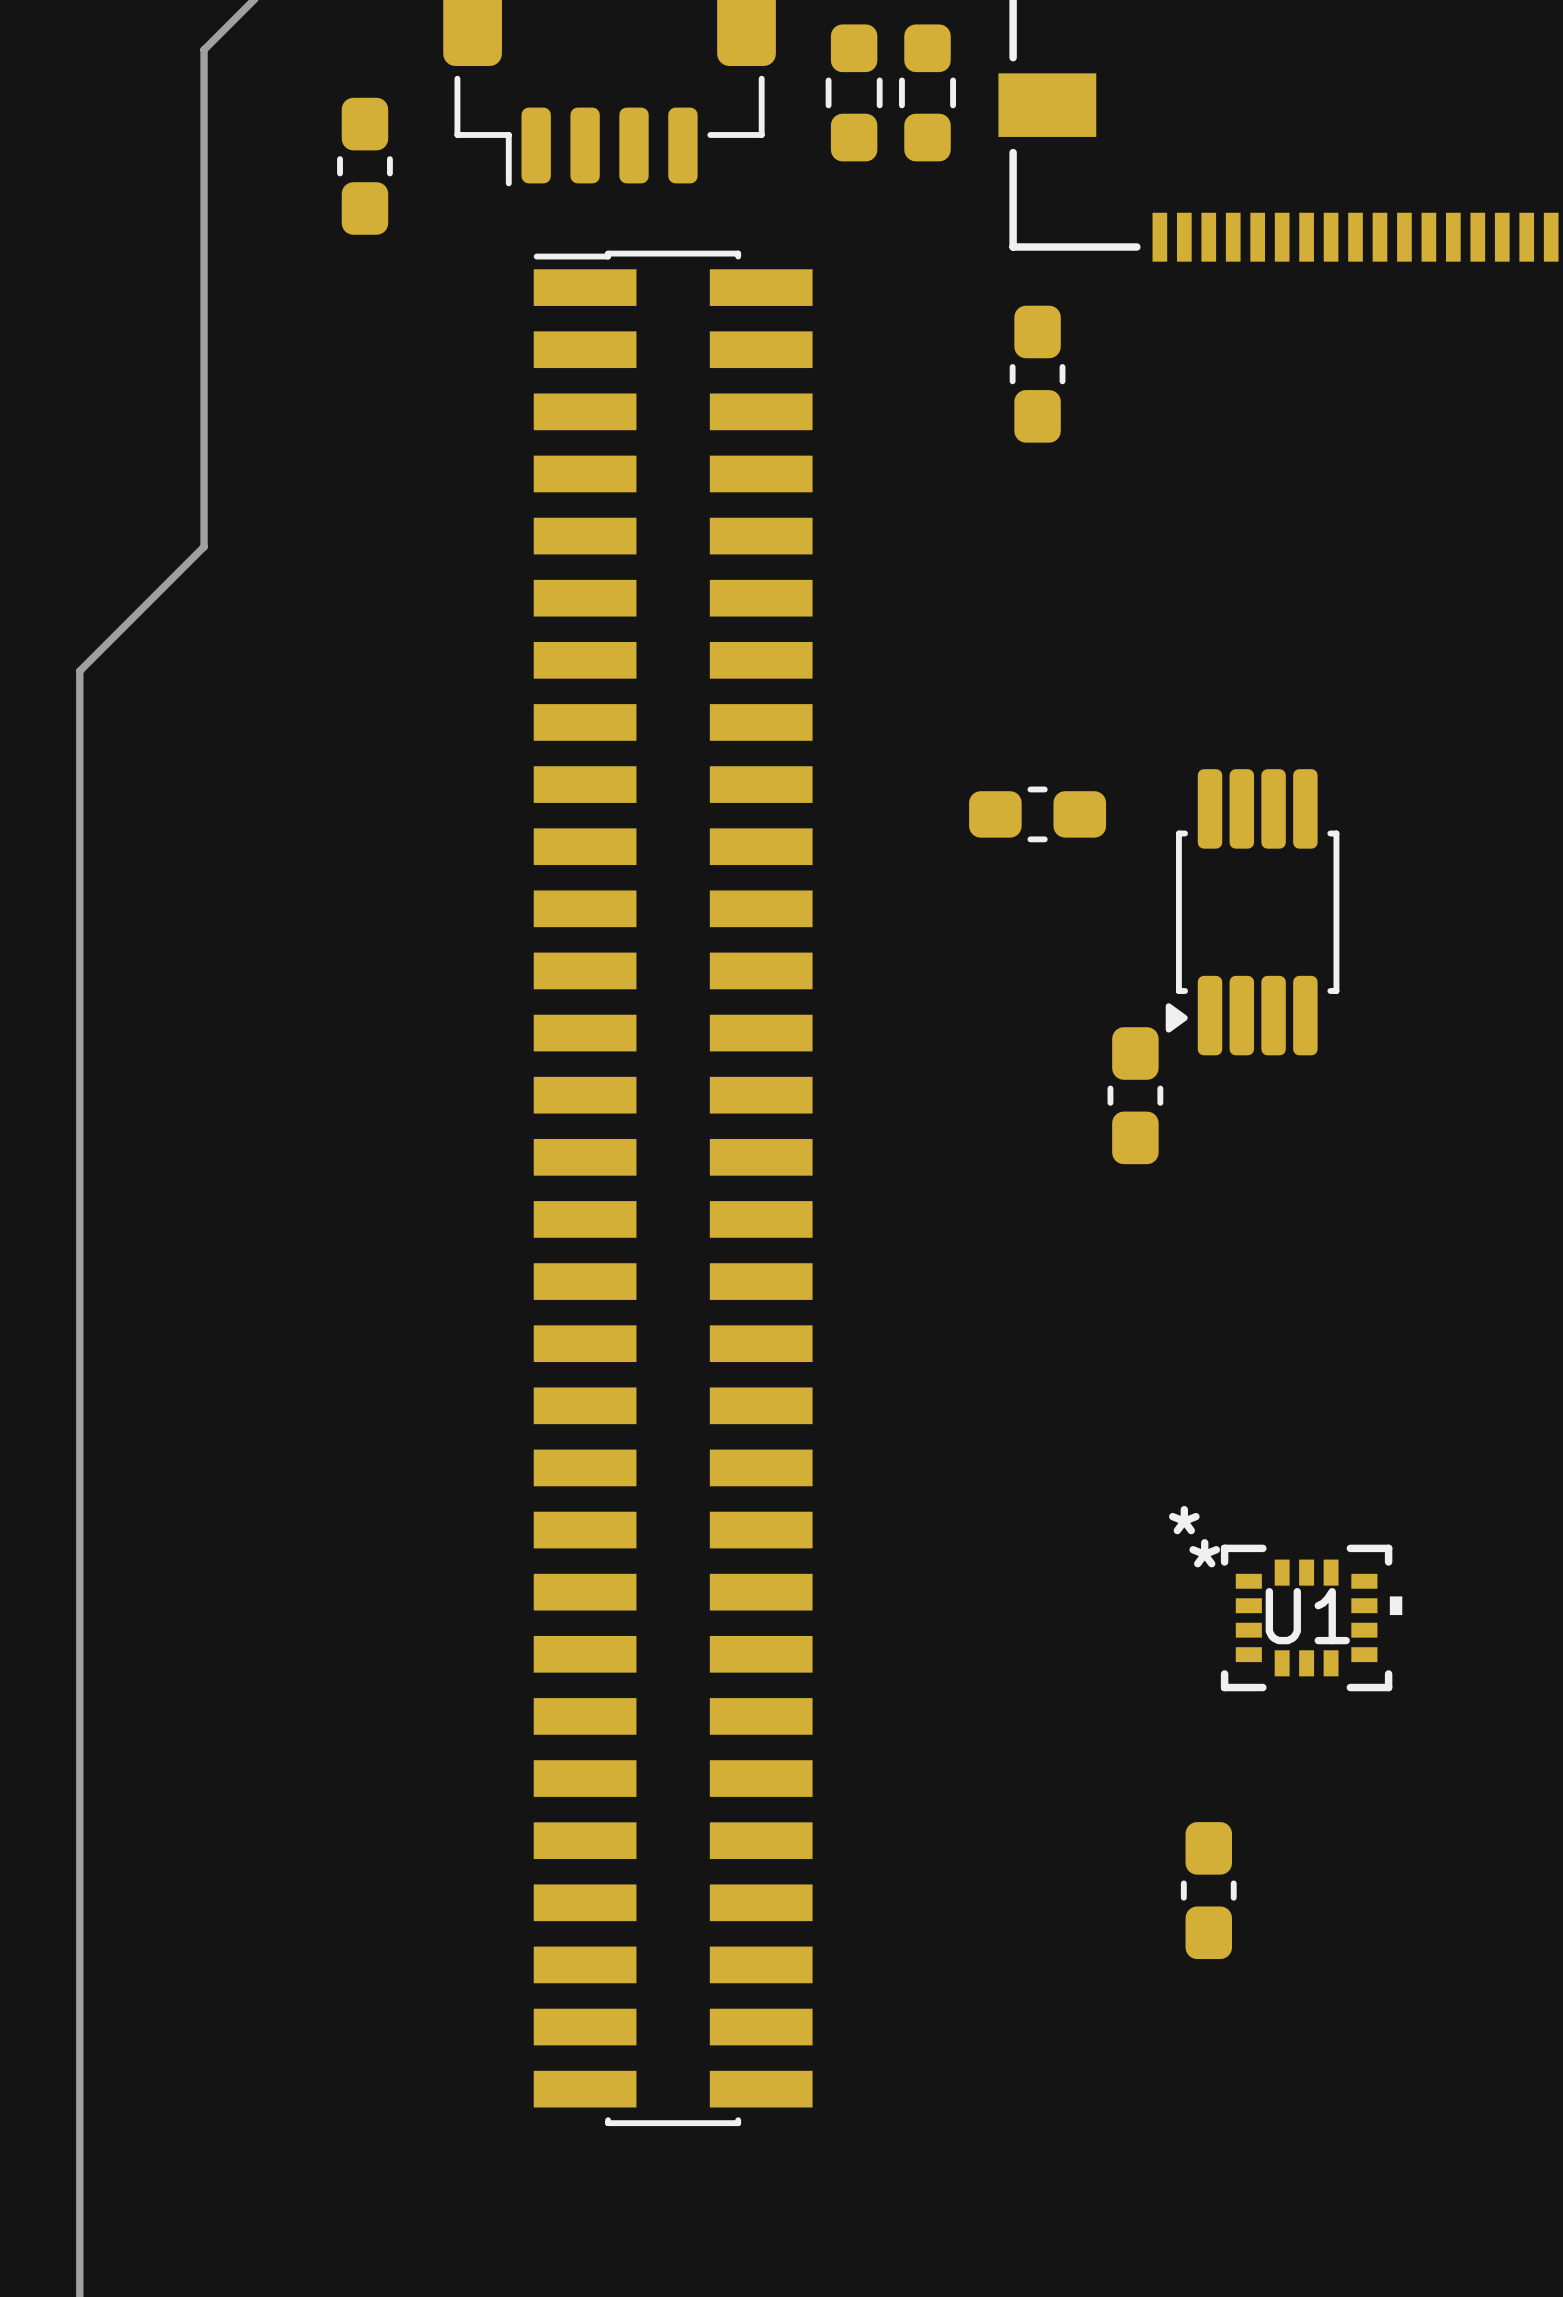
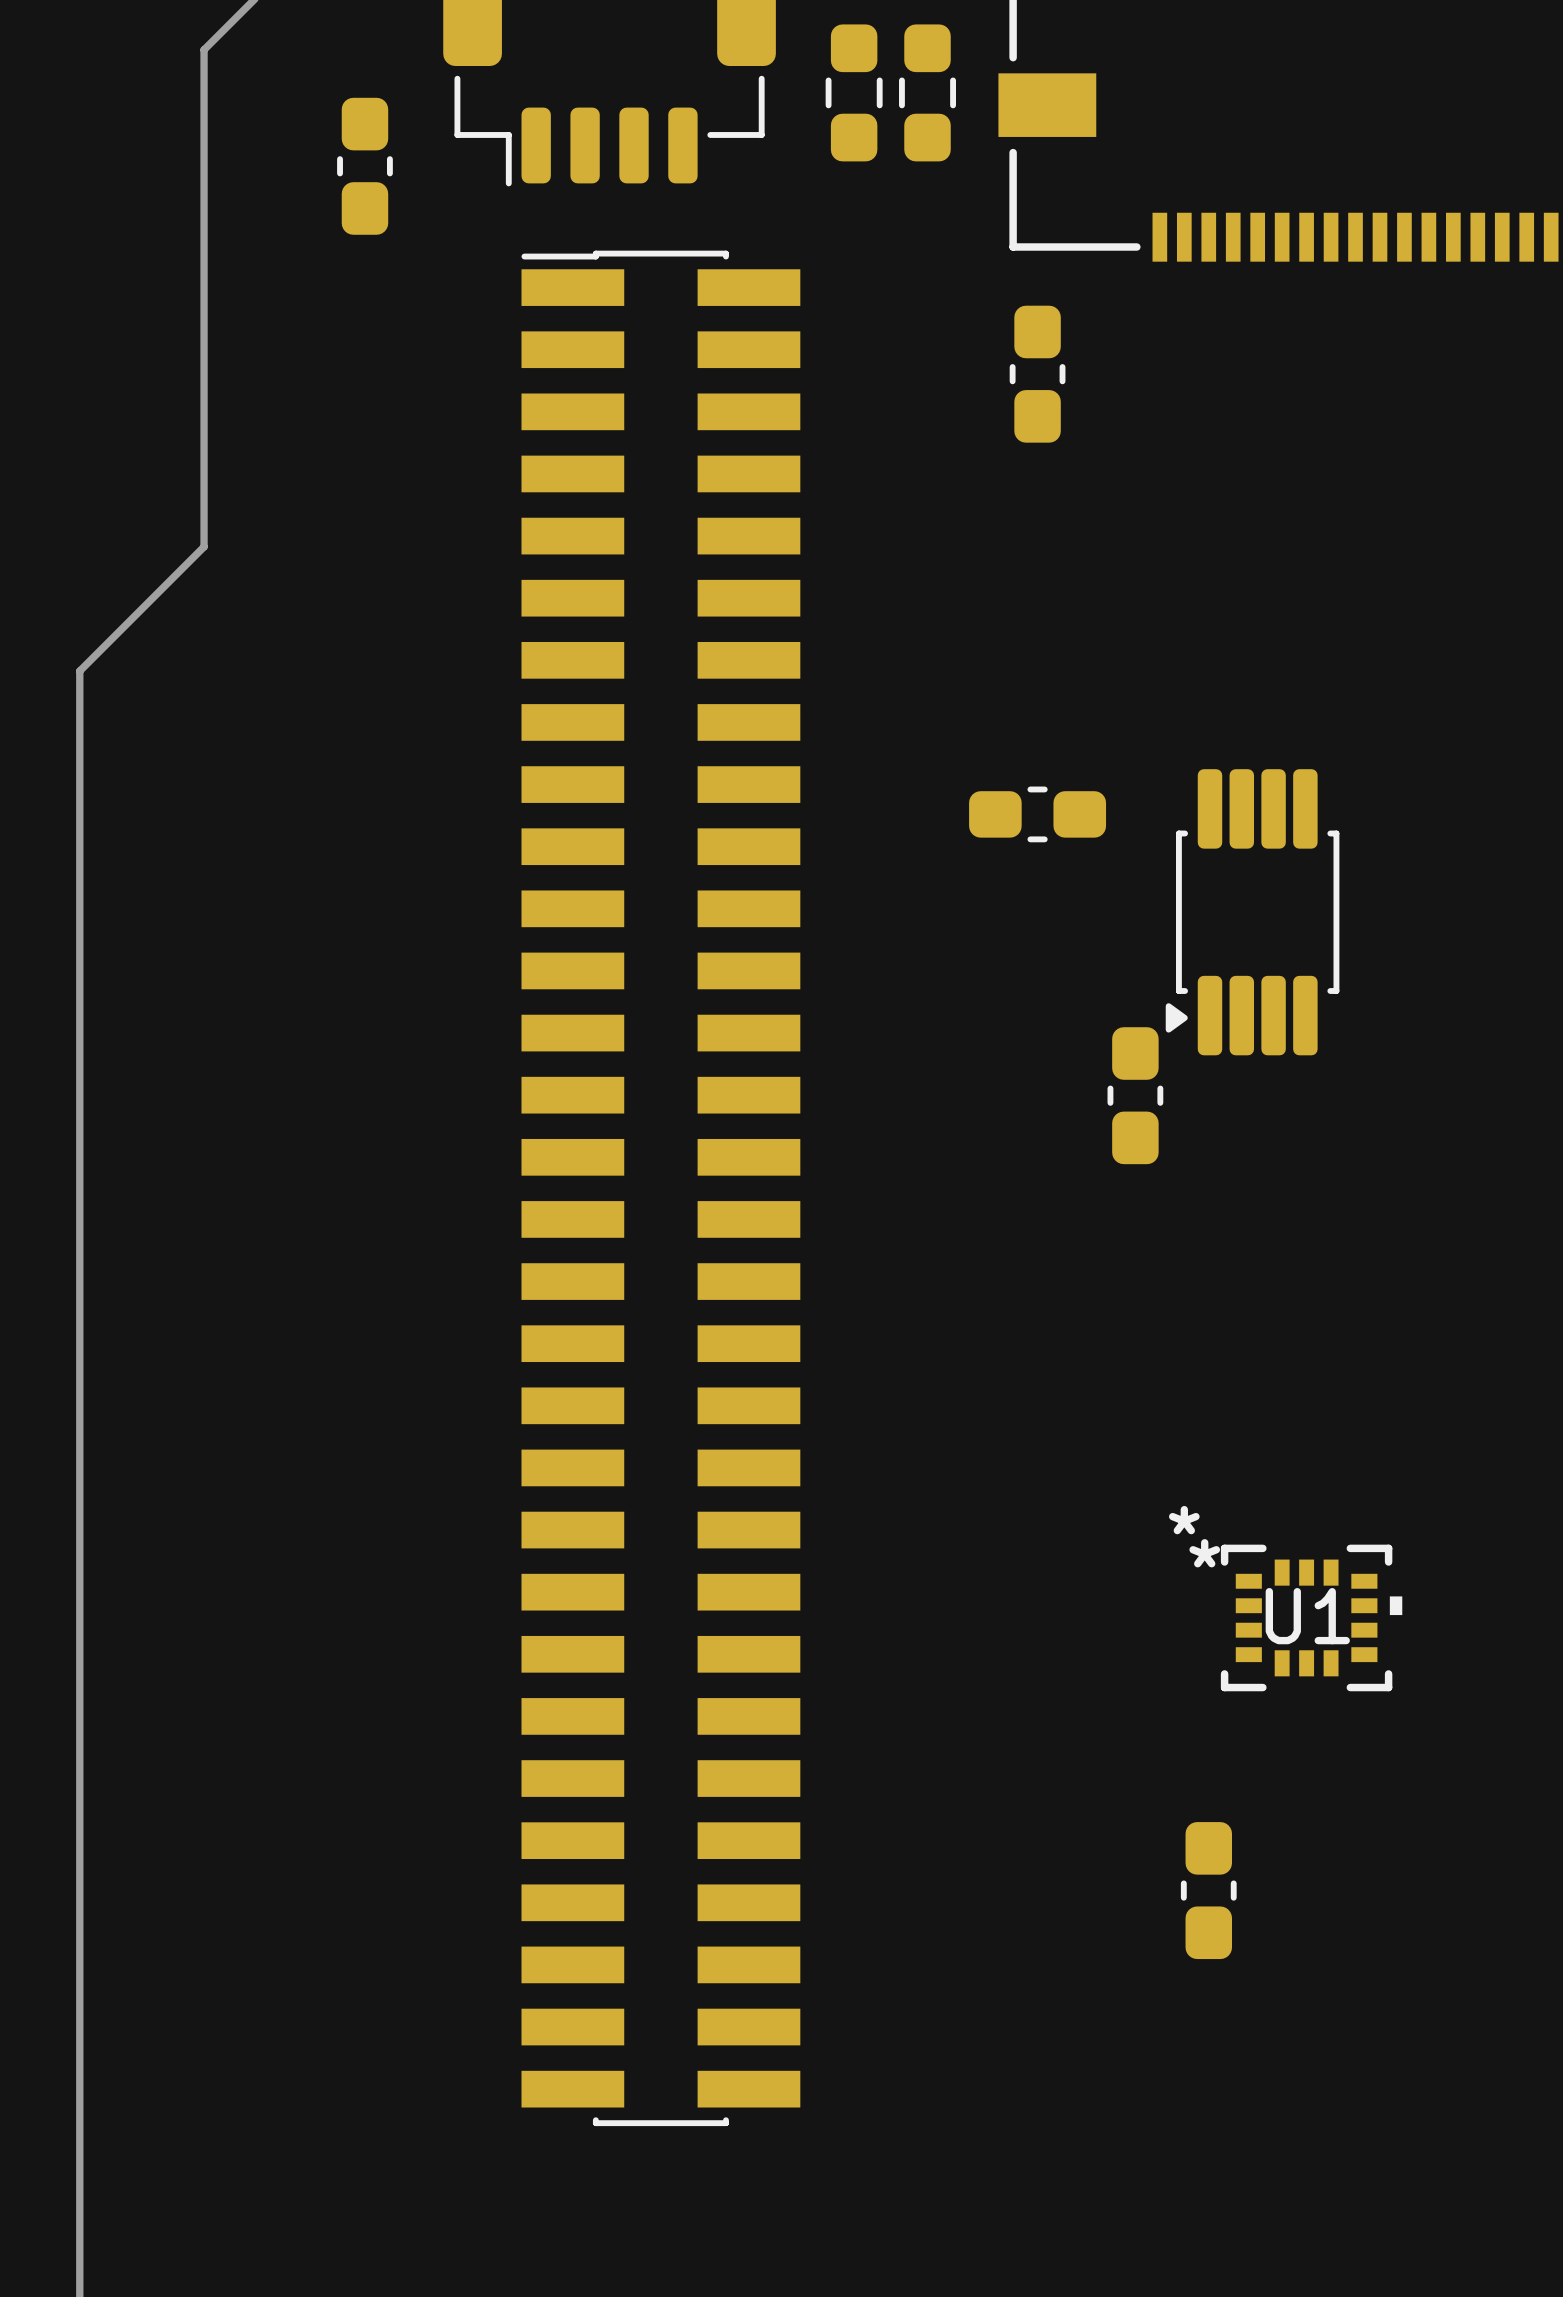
part position: (673, 1188) -> (660, 1188)

